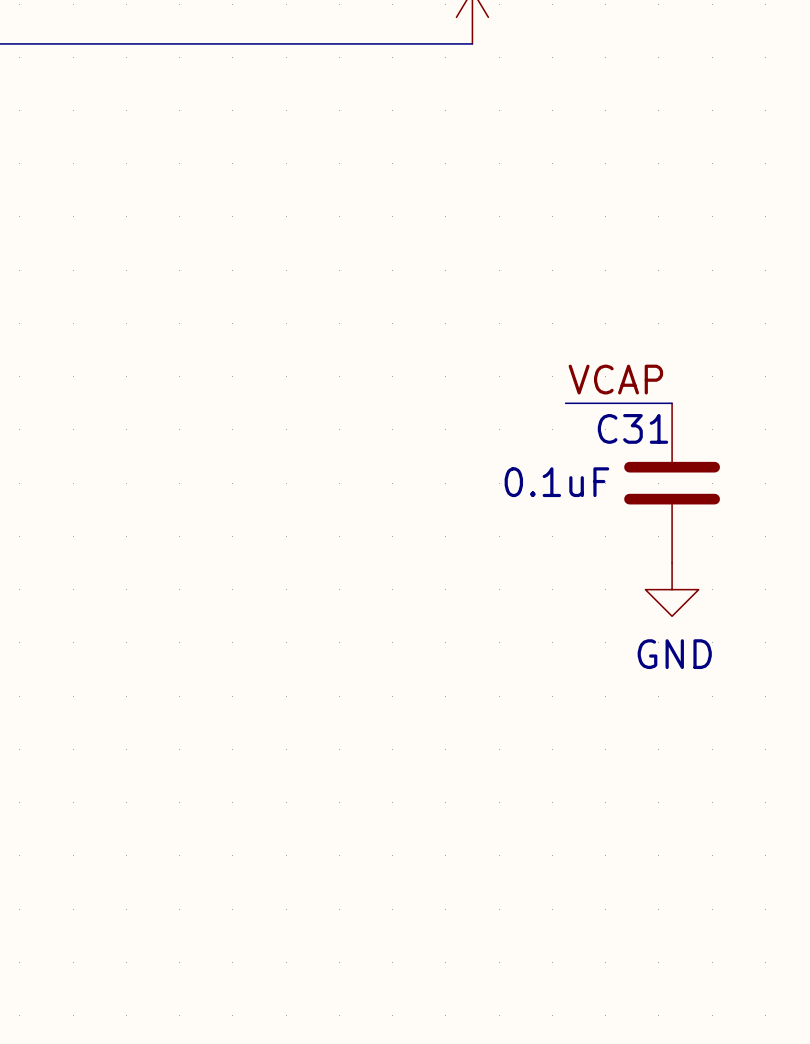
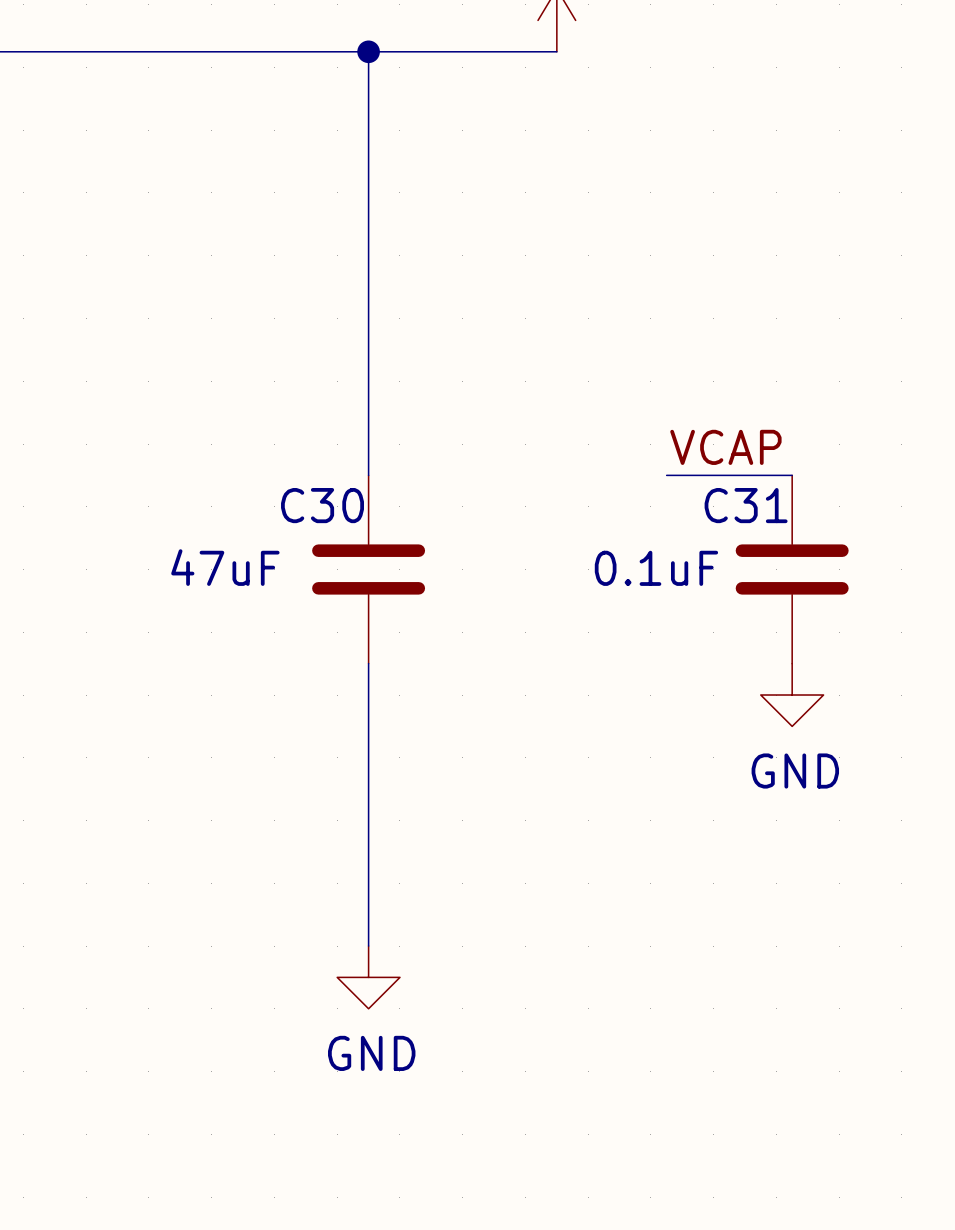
wire: none -> (368, 51) (368, 475)
junction: none -> (368, 51)
C30: none -> 47uF (368, 569)
wire: none -> (368, 663) (368, 946)
power symbol: none -> GND (368, 977)

